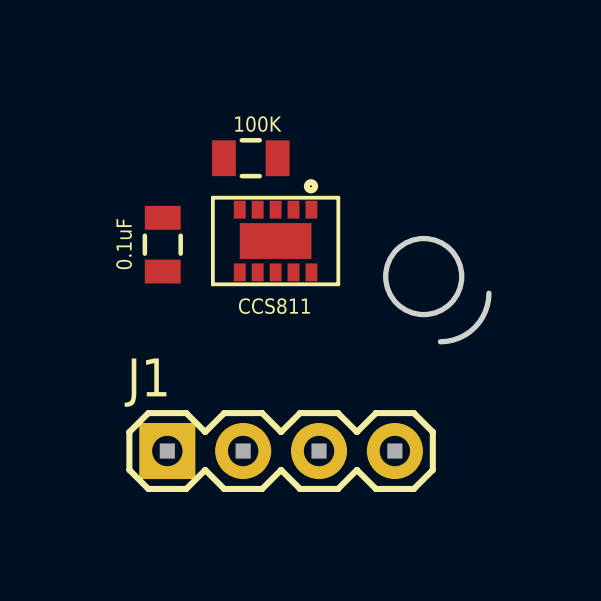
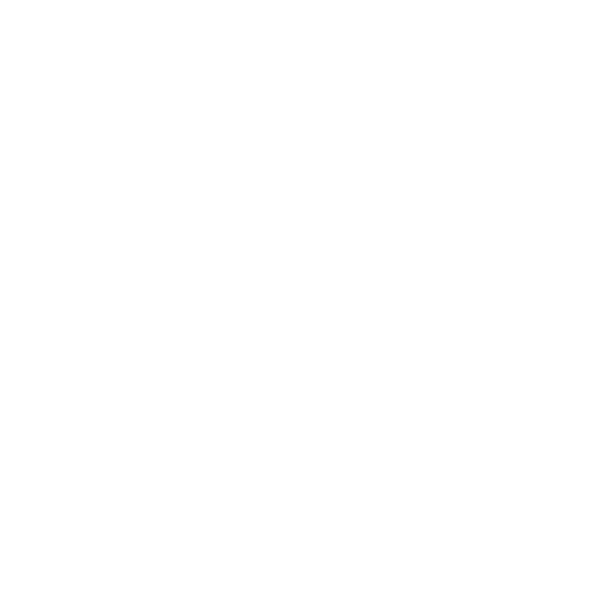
part: 100K (250, 158) -> none
part: CCS811 (275, 232) -> none
round board edge: [383, 235, 465, 318] -> none
part: 0.1uF (162, 244) -> none
board edge: (488, 293) (485, 311) (474, 327) (458, 338) (440, 341) -> none
J1: (281, 451) -> none

